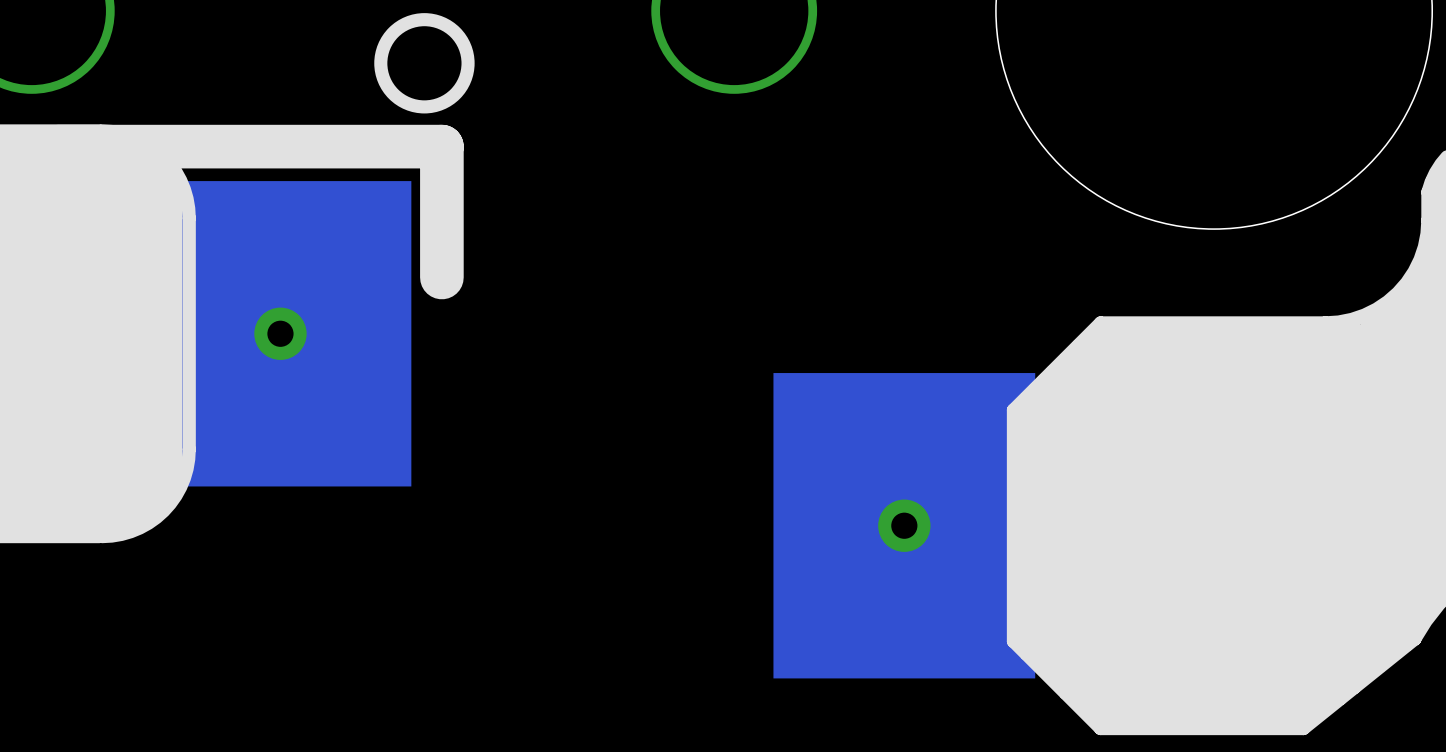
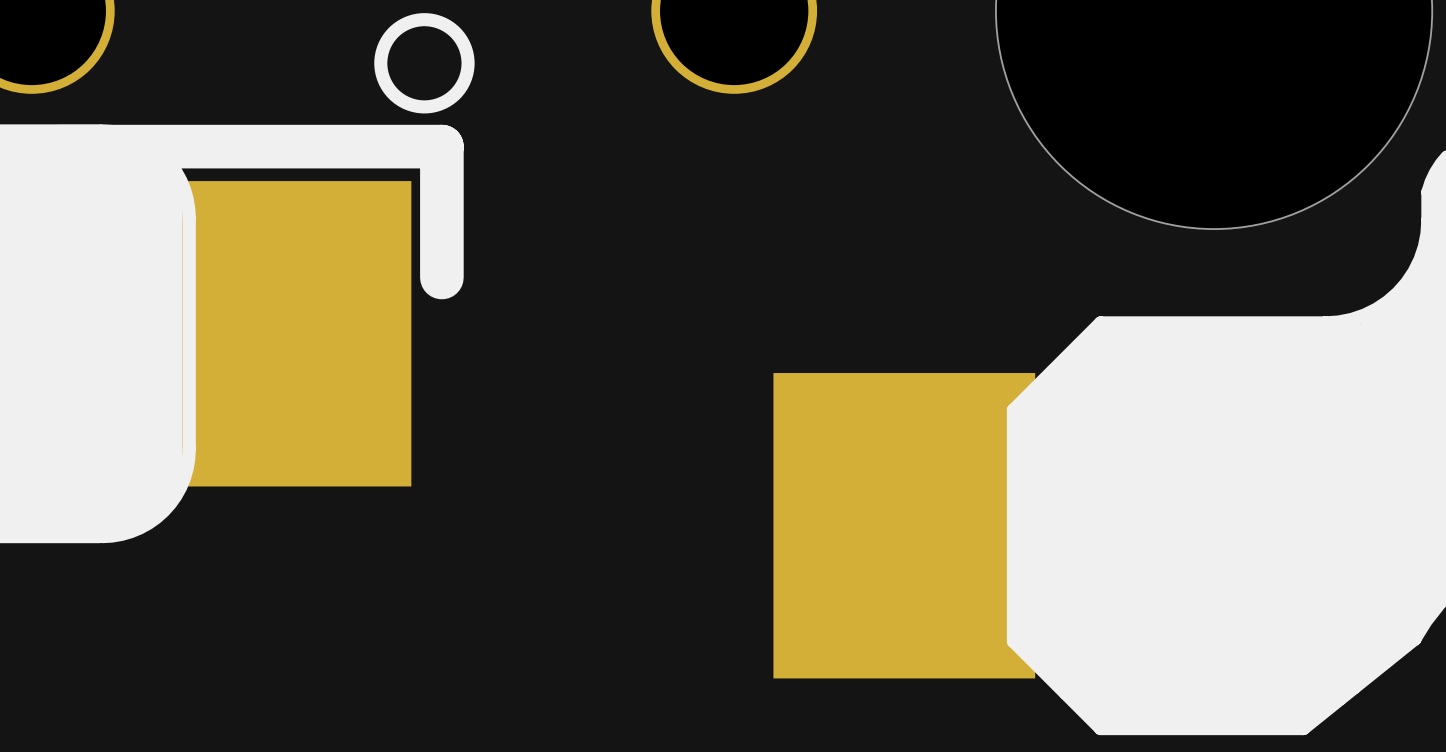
via: (280, 333) -> none
via: (904, 525) -> none

